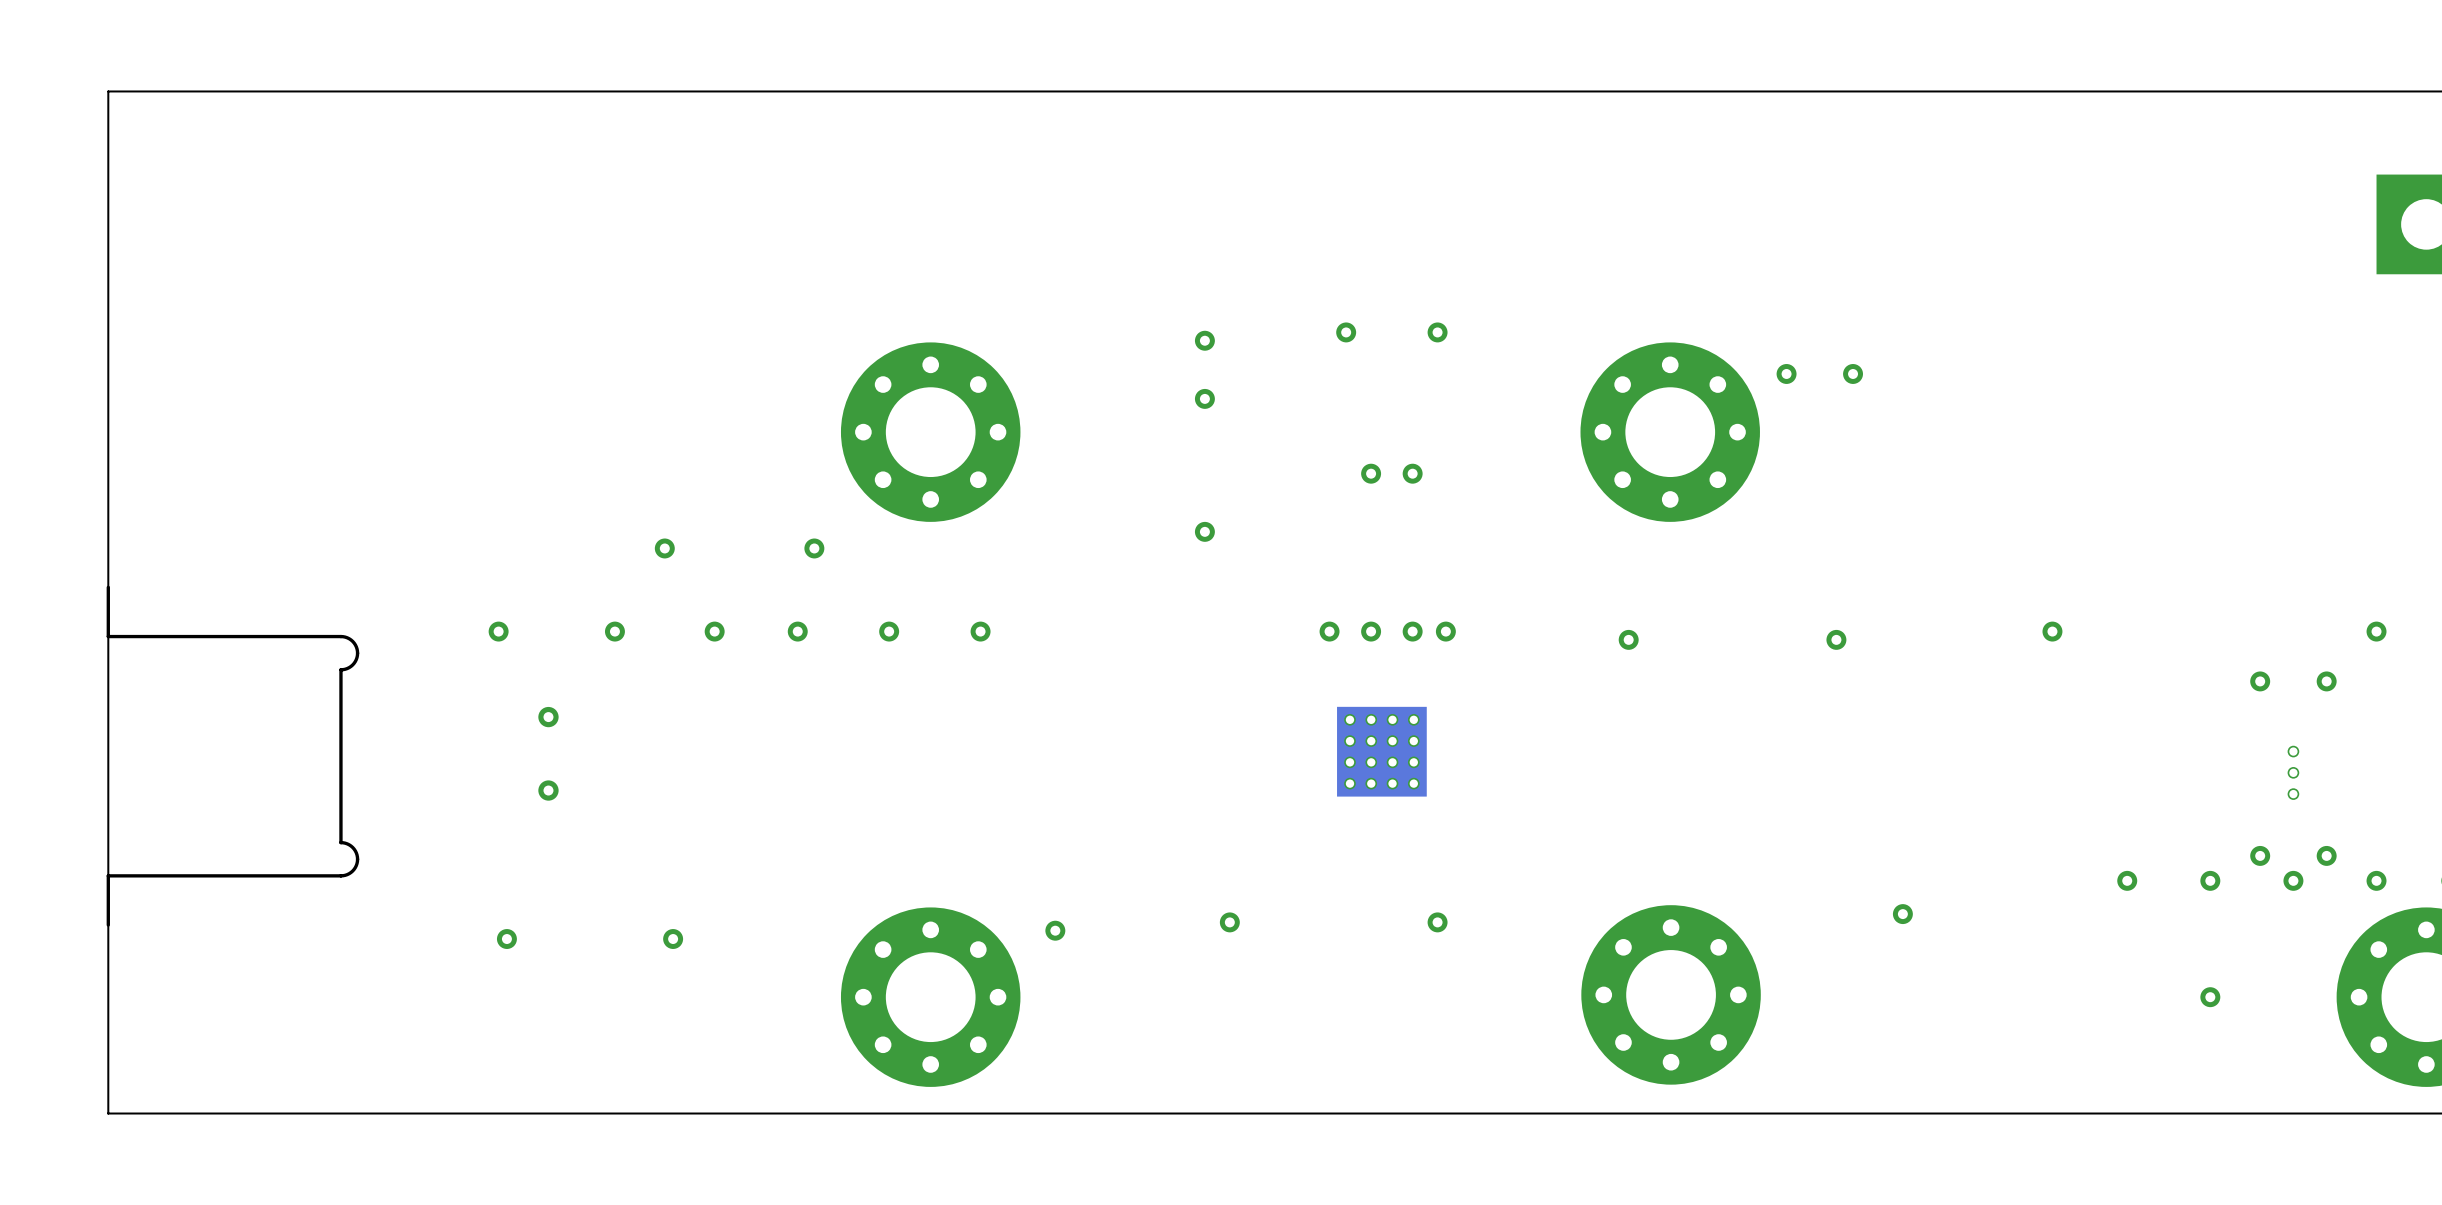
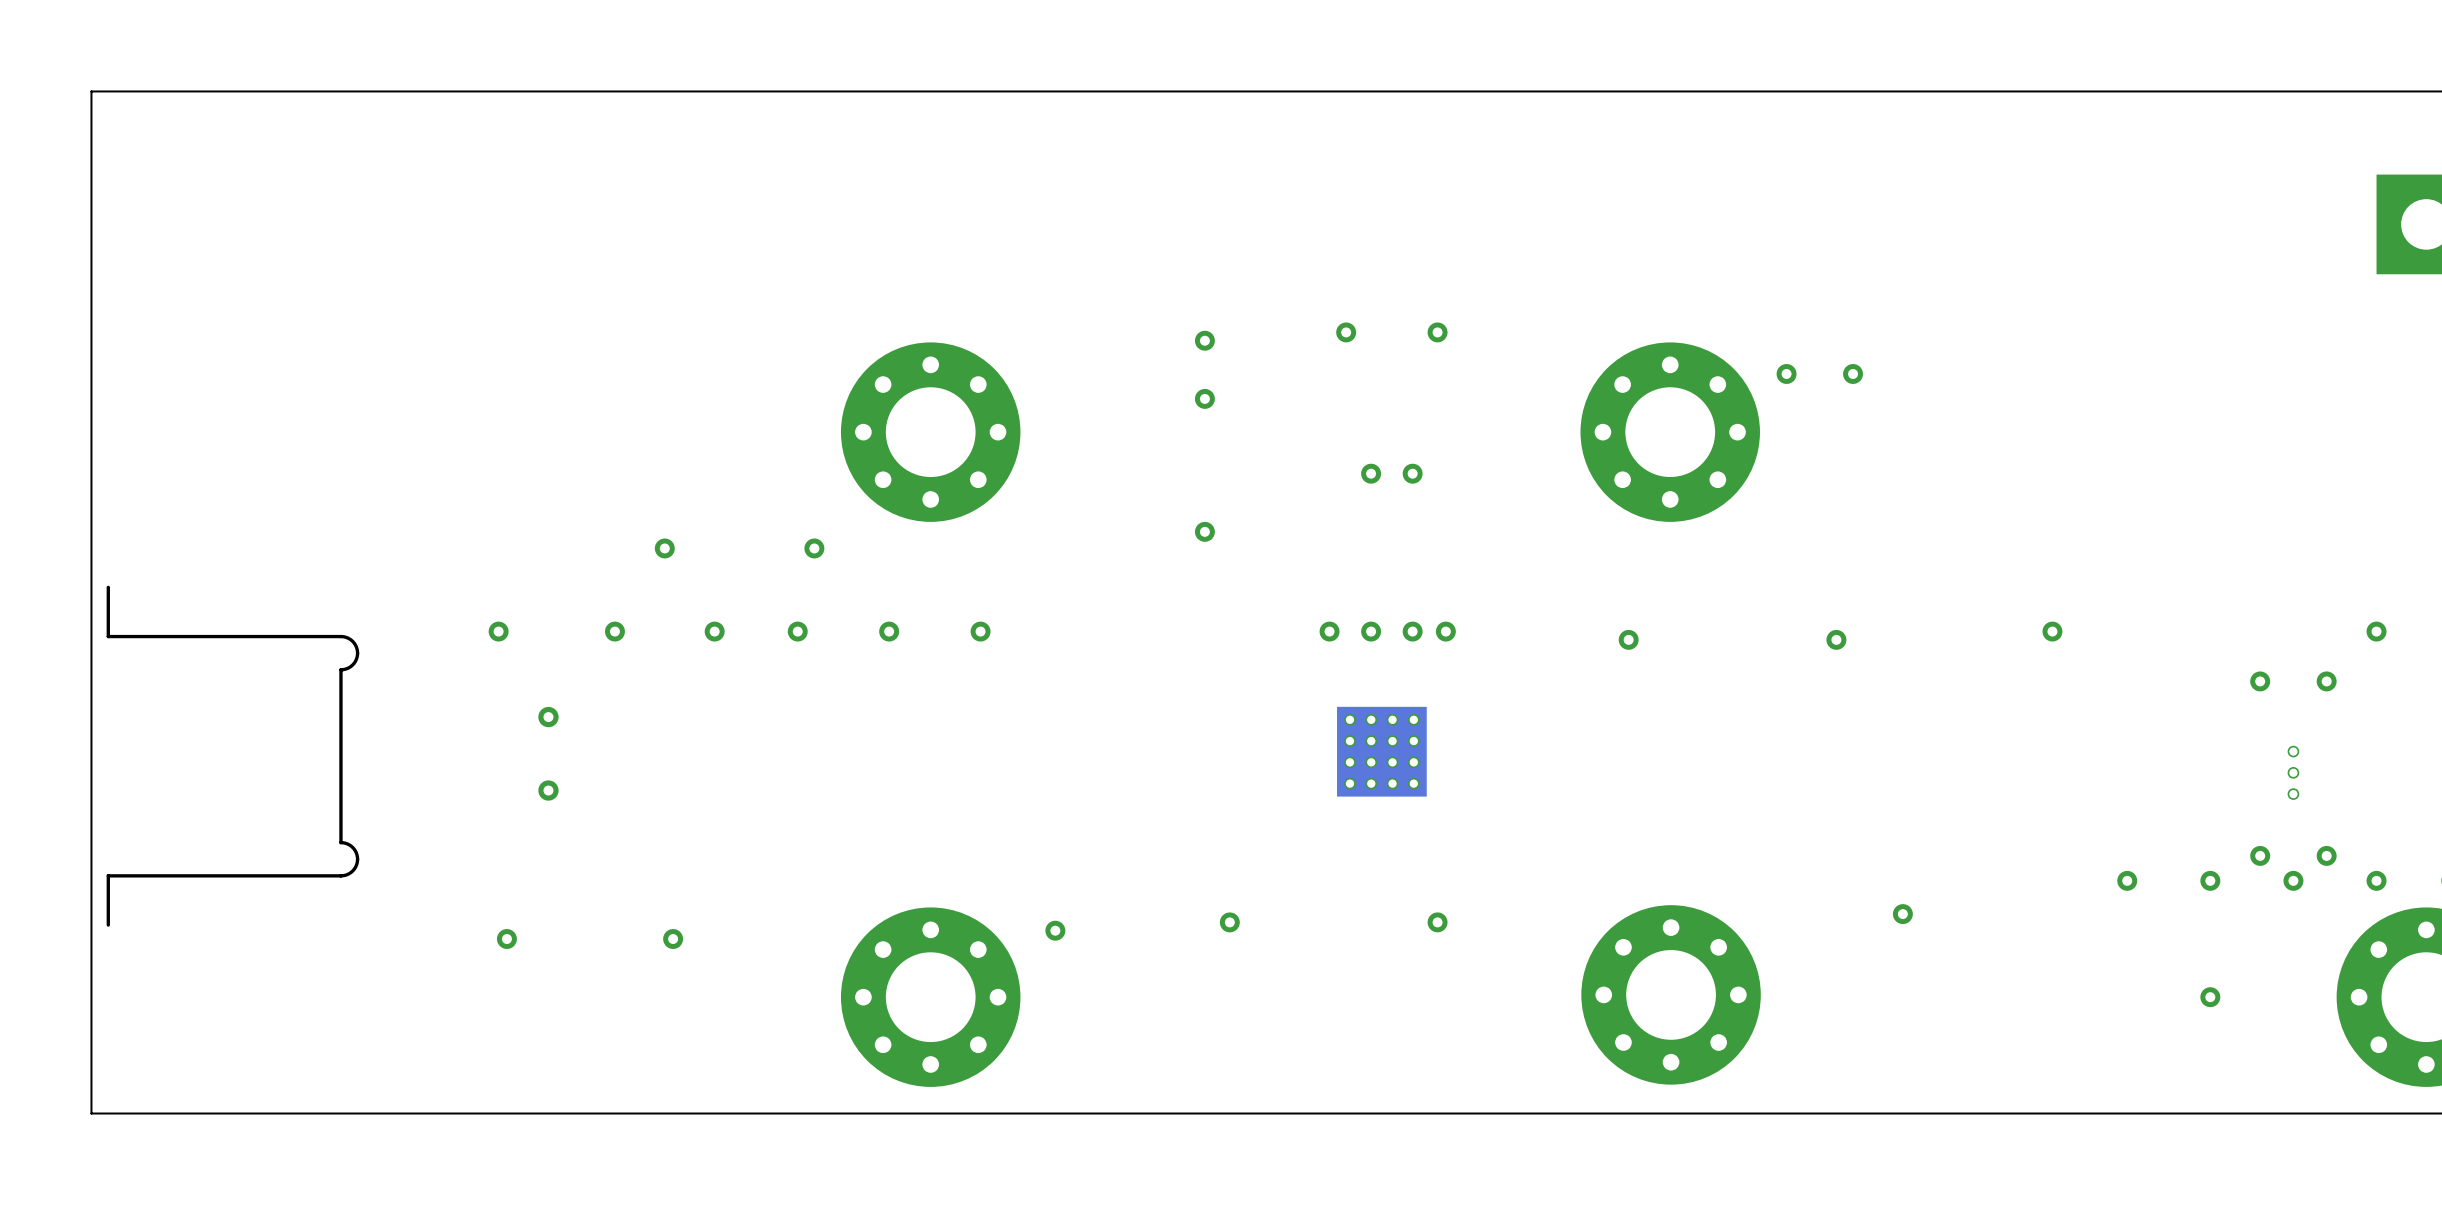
board edge: (108, 91) (108, 1113) -> (108, 91) (91, 91) (91, 1113) (108, 1113)

